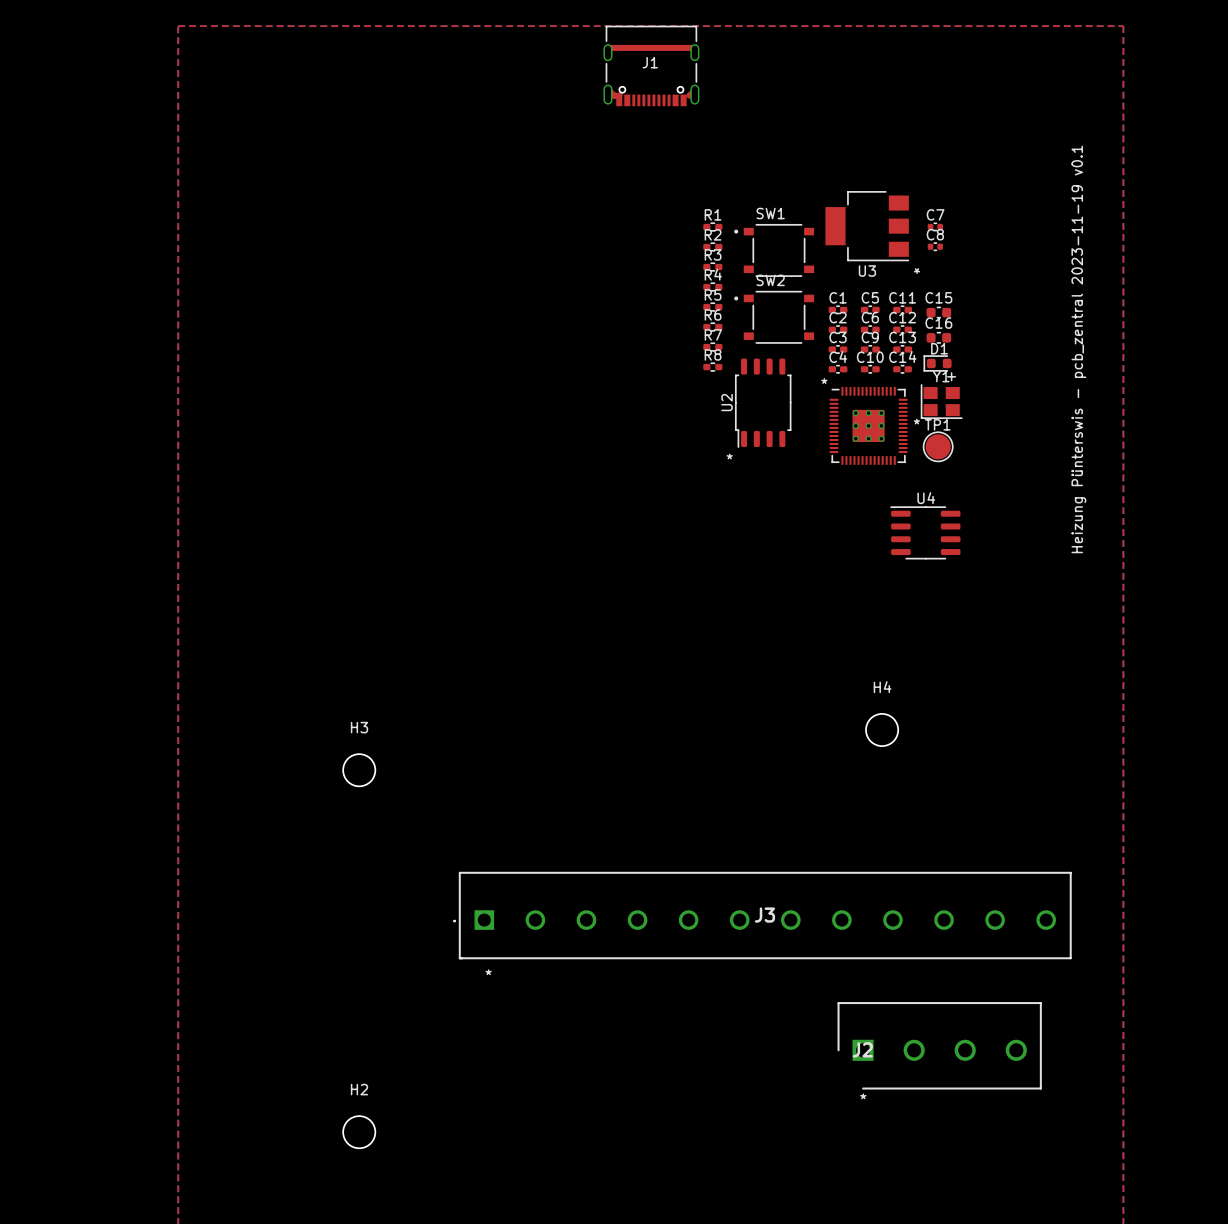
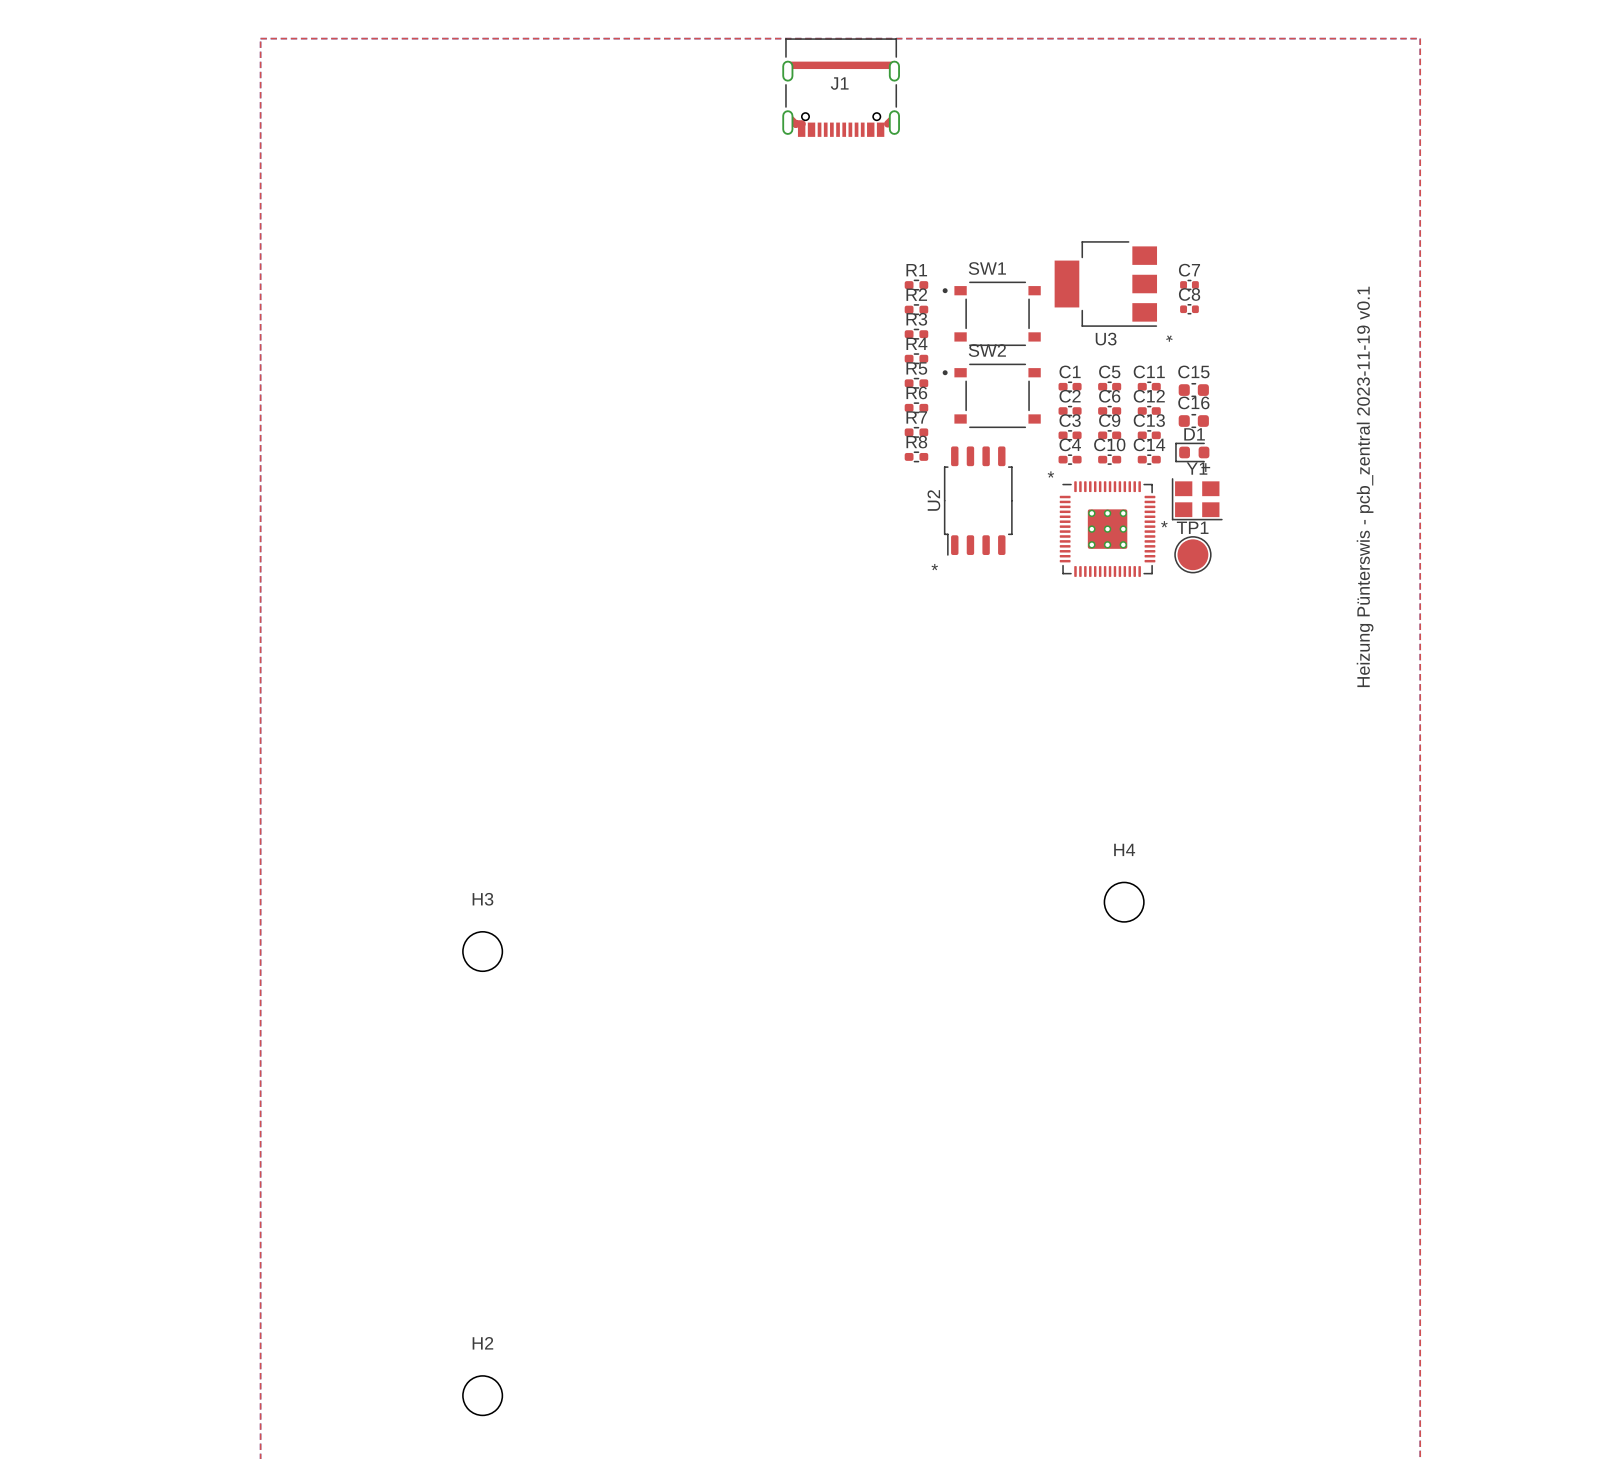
U4: (925, 532) -> none
J3: (762, 915) -> none
J2: (939, 1045) -> none

